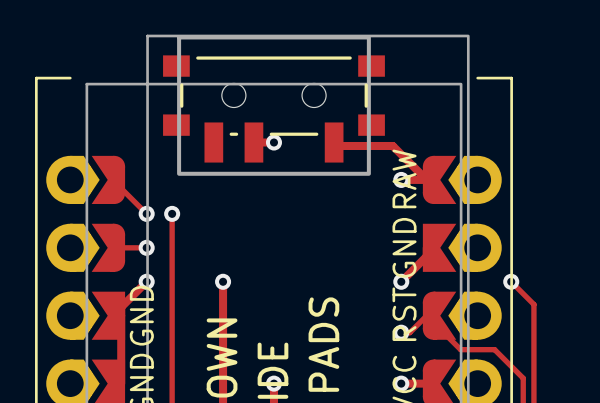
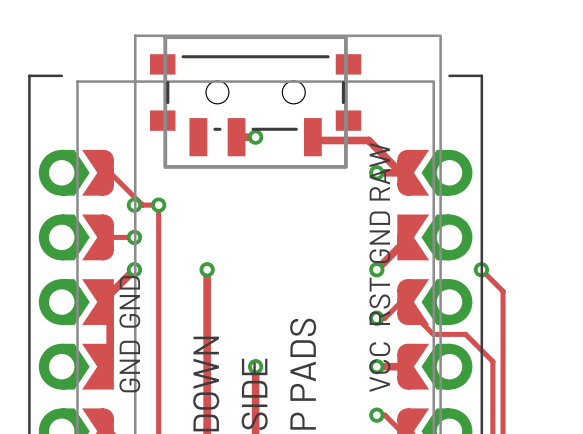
track: (121, 179) (121, 188) (146, 213) -> (110, 172) (142, 205) (158, 205)

